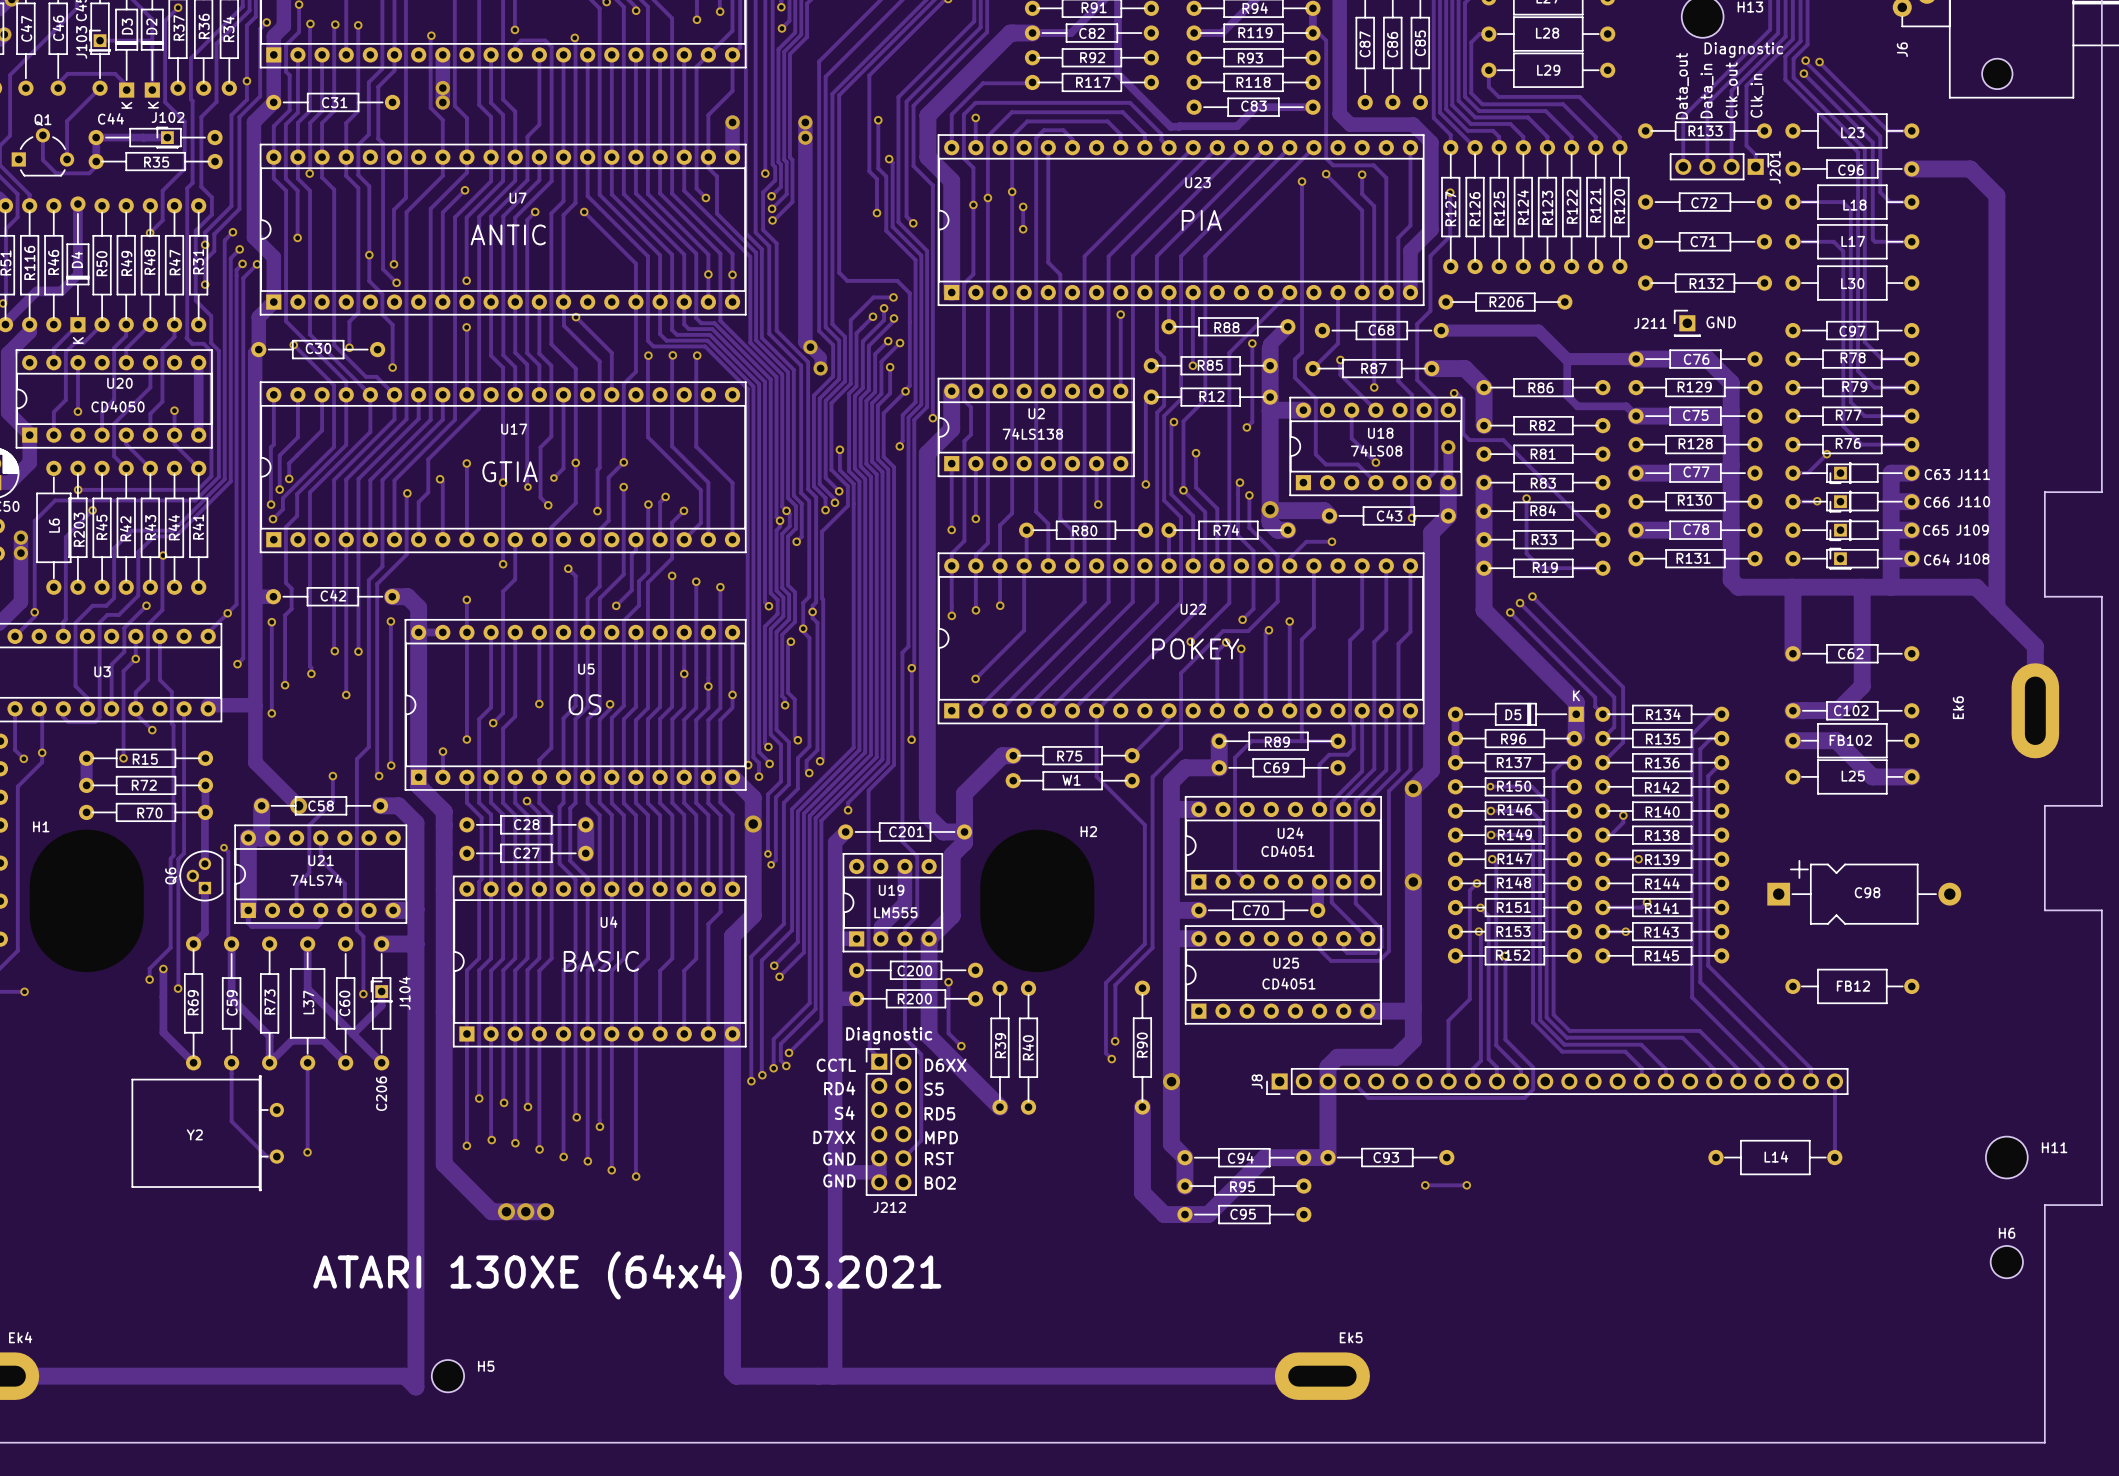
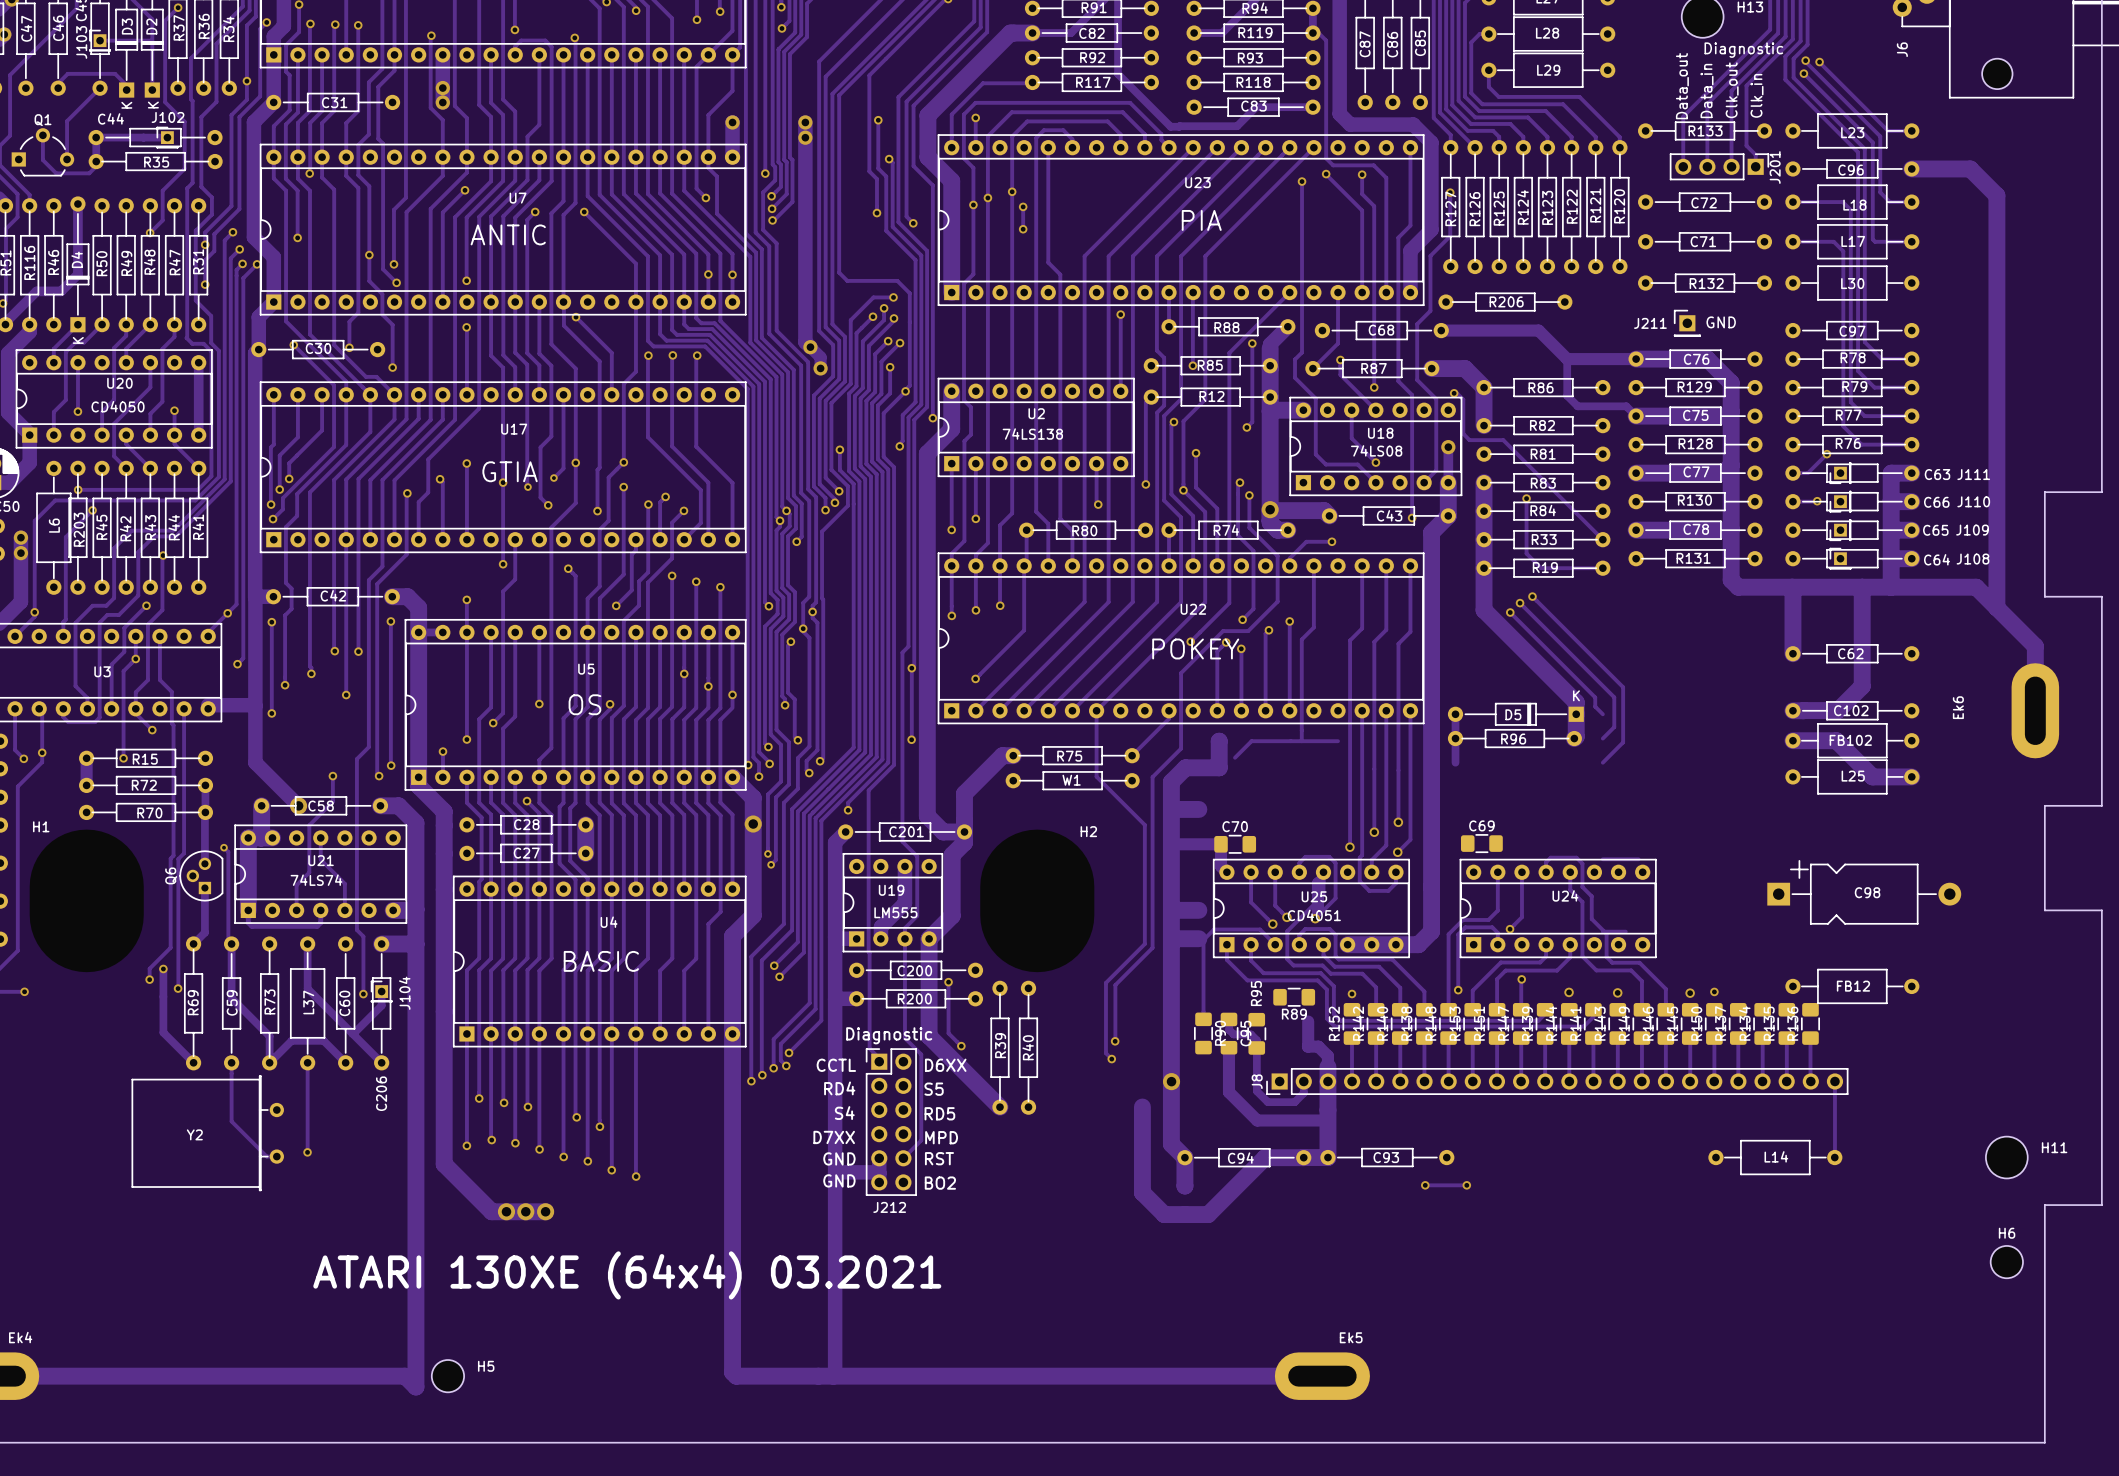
R134 footprint: [1595, 704, 1730, 724] -> [1753, 1003, 1772, 1045]
track: (1721, 714) (1712, 714) (1692, 734) (1692, 997) (1762, 1067) (1762, 1081) -> (1762, 1038) (1762, 1081)
track: (1350, 721) (1353, 725) (1353, 748) (1347, 754) (1329, 754) (1319, 764) (1319, 809) -> (1350, 721) (1350, 847)
R135 footprint: [1595, 729, 1730, 748] -> [1777, 1003, 1797, 1045]
R89 footprint: [1211, 731, 1346, 751] -> [1273, 988, 1316, 1007]
track: (1721, 738) (1710, 738) (1700, 749) (1700, 982) (1786, 1068) (1786, 1081) -> (1786, 1038) (1786, 1081)
R137 footprint: [1447, 753, 1582, 773] -> [1729, 1003, 1748, 1045]
R136 footprint: [1595, 753, 1730, 773] -> [1801, 1003, 1820, 1045]
track: (1235, 757) (1235, 869) (1247, 881) -> none
C69 footprint: [1211, 758, 1346, 778] -> [1460, 834, 1503, 853]
track: (1574, 762) (1562, 762) (1553, 771) (1553, 1014) (1569, 1030) (1699, 1030) (1738, 1069) (1738, 1081) -> (1738, 1038) (1738, 1081)
track: (1721, 762) (1708, 776) (1708, 965) (1811, 1068) (1810, 1081) -> (1810, 1038) (1810, 1081)
track: (1374, 769) (1343, 799) (1343, 809) -> (1374, 769) (1374, 832)
track: (1410, 769) (1388, 791) (1388, 951) (1379, 960) (1331, 960) (1319, 949) (1319, 938) -> (1410, 769) (1410, 839) (1397, 852)
track: (1386, 770) (1355, 800) (1355, 903) (1381, 929) (1381, 946) (1375, 953) (1347, 953) (1343, 949) (1343, 938) -> (1386, 770) (1386, 845) (1371, 859) (1371, 872)
track: (1398, 770) (1367, 801) (1367, 809) -> (1398, 770) (1398, 822)
track: (1431, 770) (1413, 788) (1413, 1040) (1396, 1057) (1337, 1057) (1327, 1066) -> (1431, 770) (1431, 931) (1418, 944) (1347, 944)
track: (1362, 771) (1331, 801) (1331, 902) (1367, 938) -> (1362, 771) (1362, 855) (1359, 857) (1359, 881) (1369, 890) (1388, 890) (1395, 883) (1395, 872)
R150 footprint: [1447, 777, 1582, 797] -> [1705, 1003, 1724, 1045]
R142 footprint: [1595, 777, 1730, 797] -> [1366, 1003, 1386, 1045]
track: (1490, 786) (1531, 786) (1546, 801) (1546, 1017) (1566, 1037) (1682, 1037) (1714, 1069) (1714, 1081) -> (1714, 1038) (1714, 1081)
via: (1490, 786) -> none
via: (1413, 788) -> none
R146 footprint: [1447, 801, 1582, 821] -> [1656, 1003, 1676, 1045]
R140 footprint: [1595, 801, 1730, 821] -> [1391, 1003, 1410, 1045]
track: (1490, 810) (1531, 810) (1540, 820) (1540, 1020) (1564, 1044) (1641, 1044) (1665, 1069) (1665, 1081) -> (1665, 1038) (1665, 1081)
via: (1490, 810) -> none
track: (1623, 815) (1623, 822) (1610, 835) (1602, 835) -> none
via: (1623, 815) -> none
via: none -> (1398, 822)
R149 footprint: [1447, 825, 1582, 845] -> [1632, 1003, 1652, 1045]
R138 footprint: [1595, 825, 1730, 845] -> [1415, 1003, 1434, 1045]
via: none -> (1374, 832)
track: (1491, 835) (1526, 835) (1533, 841) (1533, 1022) (1562, 1051) (1625, 1051) (1641, 1068) (1641, 1081) -> (1641, 1038) (1641, 1081)
via: (1491, 835) -> none
track: none -> (1171, 843) (1221, 844) (1221, 866) (1226, 872)
U24 position: (1283, 845) -> (1558, 908)
via: none -> (1349, 847)
R147 footprint: [1447, 849, 1582, 869] -> [1512, 1003, 1531, 1045]
R139 footprint: [1595, 849, 1730, 869] -> [1535, 1003, 1555, 1045]
text: CD4051 (1288, 851) -> none
via: none -> (1397, 852)
track: (1492, 859) (1496, 863) (1496, 1045) (1521, 1070) (1521, 1081) -> (1521, 1038) (1521, 1081)
via: (1492, 859) -> none
via: (1638, 859) -> none
track: none -> (1251, 872) (1251, 902) (1272, 924)
track: none -> (1275, 872) (1275, 905) (1286, 917)
track: none -> (1299, 872) (1299, 863) (1305, 856) (1329, 856) (1335, 863) (1335, 898) (1315, 918)
track: none -> (1323, 872) (1323, 895) (1287, 931) (1287, 959) (1293, 965) (1322, 965) (1330, 973) (1362, 973) (1376, 987) (1376, 1009)
track: none -> (1497, 872) (1497, 910) (1488, 919) (1462, 919) (1448, 934) (1448, 1009)
track: none -> (1521, 872) (1521, 917) (1510, 929)
track: none -> (1546, 872) (1546, 862) (1550, 857) (1576, 857) (1582, 863) (1582, 887) (1591, 896) (1591, 919) (1606, 933) (1606, 957) (1612, 962) (1639, 962) (1665, 989) (1665, 1009)
track: none -> (1570, 872) (1570, 889) (1582, 902) (1582, 956) (1596, 970) (1631, 970) (1641, 981) (1641, 1009)
R148 footprint: [1447, 874, 1582, 893] -> [1439, 1003, 1458, 1045]
R144 footprint: [1595, 874, 1730, 893] -> [1560, 1003, 1579, 1045]
via: (1413, 881) -> none
track: (1476, 883) (1469, 890) (1469, 999) (1448, 1020) (1448, 1081) -> (1448, 1038) (1448, 1081)
via: (1476, 883) -> none
R151 footprint: [1447, 898, 1582, 917] -> [1487, 1003, 1507, 1045]
R141 footprint: [1595, 898, 1730, 917] -> [1584, 1003, 1603, 1045]
C70 footprint: [1191, 900, 1326, 920] -> [1214, 835, 1257, 854]
track: (1647, 902) (1641, 907) (1602, 907) -> none
via: (1647, 902) -> none
track: (1480, 907) (1488, 916) (1488, 1059) (1496, 1067) (1496, 1081) -> (1497, 1038) (1496, 1081)
via: (1480, 907) -> none
text: none -> CD4051 (1314, 915)
via: none -> (1286, 917)
via: none -> (1315, 918)
R153 footprint: [1447, 922, 1582, 942] -> [1463, 1003, 1482, 1045]
R143 footprint: [1595, 922, 1730, 942] -> [1608, 1003, 1628, 1045]
via: none -> (1272, 924)
via: none -> (1510, 929)
track: (1478, 931) (1480, 933) (1480, 1060) (1472, 1068) (1472, 1081) -> (1472, 1038) (1472, 1081)
via: (1478, 931) -> none
via: (1625, 931) -> none
track: none -> (1226, 944) (1226, 959) (1247, 980) (1317, 980) (1326, 989) (1326, 1018) (1334, 1026) (1583, 1026) (1593, 1016) (1593, 1009)
track: none -> (1251, 944) (1251, 960) (1263, 973) (1320, 973) (1333, 986) (1333, 1014) (1340, 1020) (1538, 1020) (1545, 1014) (1545, 1009)
track: none -> (1275, 944) (1260, 929) (1214, 929) (1203, 940) (1203, 1019)
track: none -> (1299, 944) (1299, 935) (1305, 929) (1329, 929) (1335, 934) (1335, 956) (1338, 959) (1392, 959) (1424, 991) (1424, 1009)
track: none -> (1323, 944) (1323, 955) (1334, 966) (1379, 966) (1400, 987) (1400, 1009)
track: none -> (1497, 944) (1497, 932) (1492, 927) (1465, 927) (1458, 934) (1458, 990)
track: none -> (1546, 944) (1546, 956) (1540, 962) (1500, 962) (1472, 990) (1472, 1009)
track: none -> (1570, 944) (1570, 957) (1557, 970) (1505, 970) (1497, 979) (1497, 1009)
R152 footprint: [1447, 946, 1582, 966] -> [1342, 1003, 1362, 1045]
R145 footprint: [1595, 946, 1730, 966] -> [1681, 1003, 1700, 1045]
track: (1505, 955) (1505, 1039) (1533, 1067) (1533, 1089) (1524, 1098) (1368, 1098) (1352, 1081) -> (1352, 1038) (1352, 1081)
via: (1505, 955) -> none
U25 position: (1283, 974) -> (1311, 908)
track: none -> (1521, 979) (1521, 1009)
via: none -> (1521, 979)
R90 footprint: [1133, 980, 1152, 1115] -> [1194, 1012, 1213, 1055]
text: CD4051 (1288, 983) -> none
via: none -> (1458, 990)
via: none -> (1714, 991)
via: none -> (1569, 992)
via: none -> (1617, 992)
via: none -> (1352, 993)
via: none -> (1690, 993)
track: (1413, 1008) (1410, 1011) (1367, 1011) -> none
track: none -> (1228, 1019) (1229, 1029) (1233, 1034) (1250, 1034) (1256, 1040) (1256, 1047)
track: none -> (1308, 1021) (1307, 1046) (1318, 1046) (1327, 1056) (1327, 1066)
track: none -> (1376, 1038) (1376, 1081)
track: none -> (1400, 1038) (1400, 1081)
track: none -> (1424, 1038) (1424, 1081)
track: none -> (1545, 1038) (1545, 1081)
track: none -> (1569, 1038) (1569, 1081)
track: none -> (1593, 1038) (1593, 1081)
track: none -> (1617, 1038) (1617, 1081)
track: none -> (1690, 1038) (1690, 1081)
track: none -> (1228, 1047) (1228, 1092) (1257, 1120) (1327, 1120) (1327, 1110)
track: none -> (1256, 1047) (1256, 1091) (1267, 1102) (1294, 1102) (1303, 1093) (1303, 1081)
R95 footprint: [1177, 1176, 1312, 1196] -> [1247, 1012, 1266, 1055]
R95 name position: R95 (1242, 1186) -> R95 (1256, 993)
C95 footprint: [1177, 1205, 1312, 1224] -> [1219, 1012, 1239, 1055]

